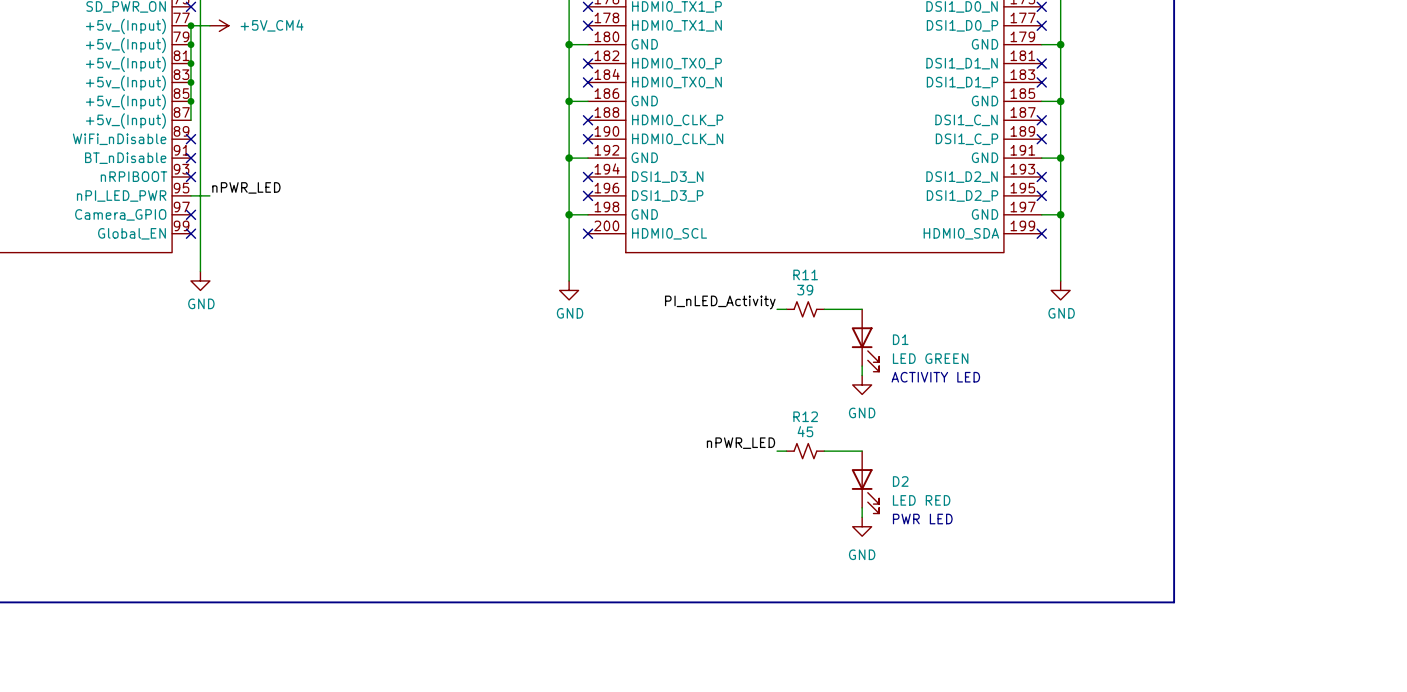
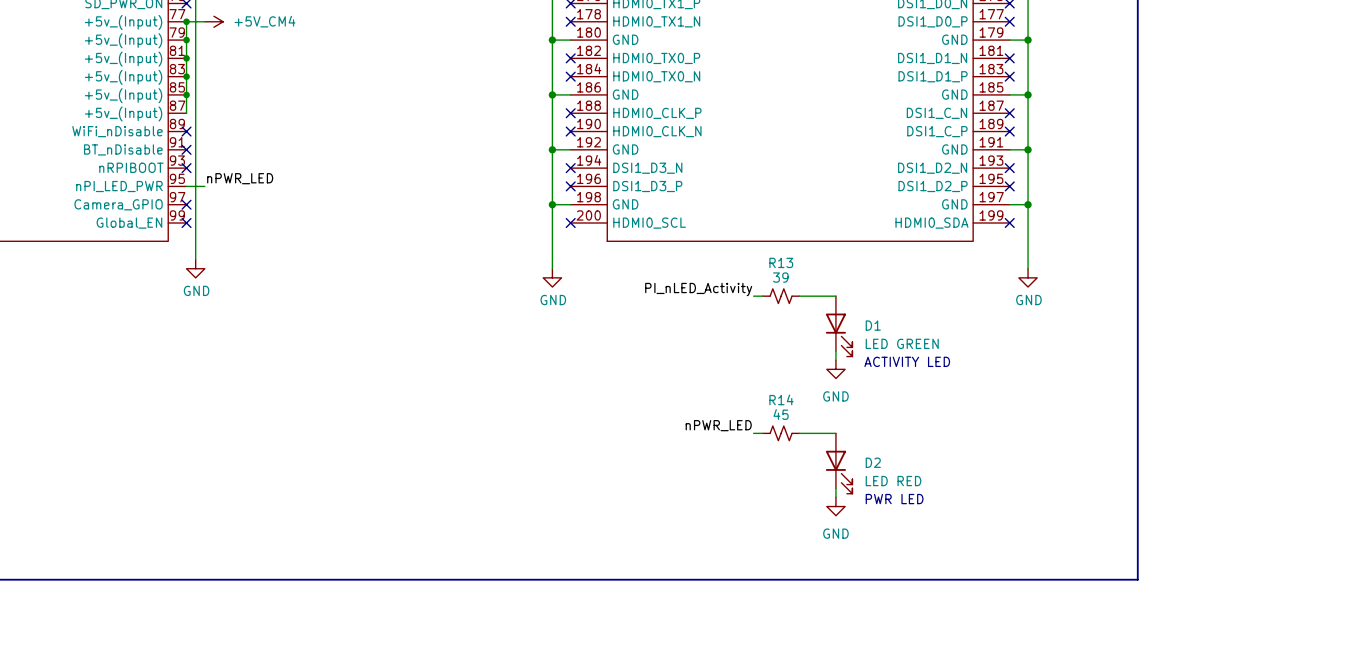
R11 name: R11 (805, 274) -> R13 (781, 262)
R12 name: R12 (805, 416) -> R14 (781, 399)

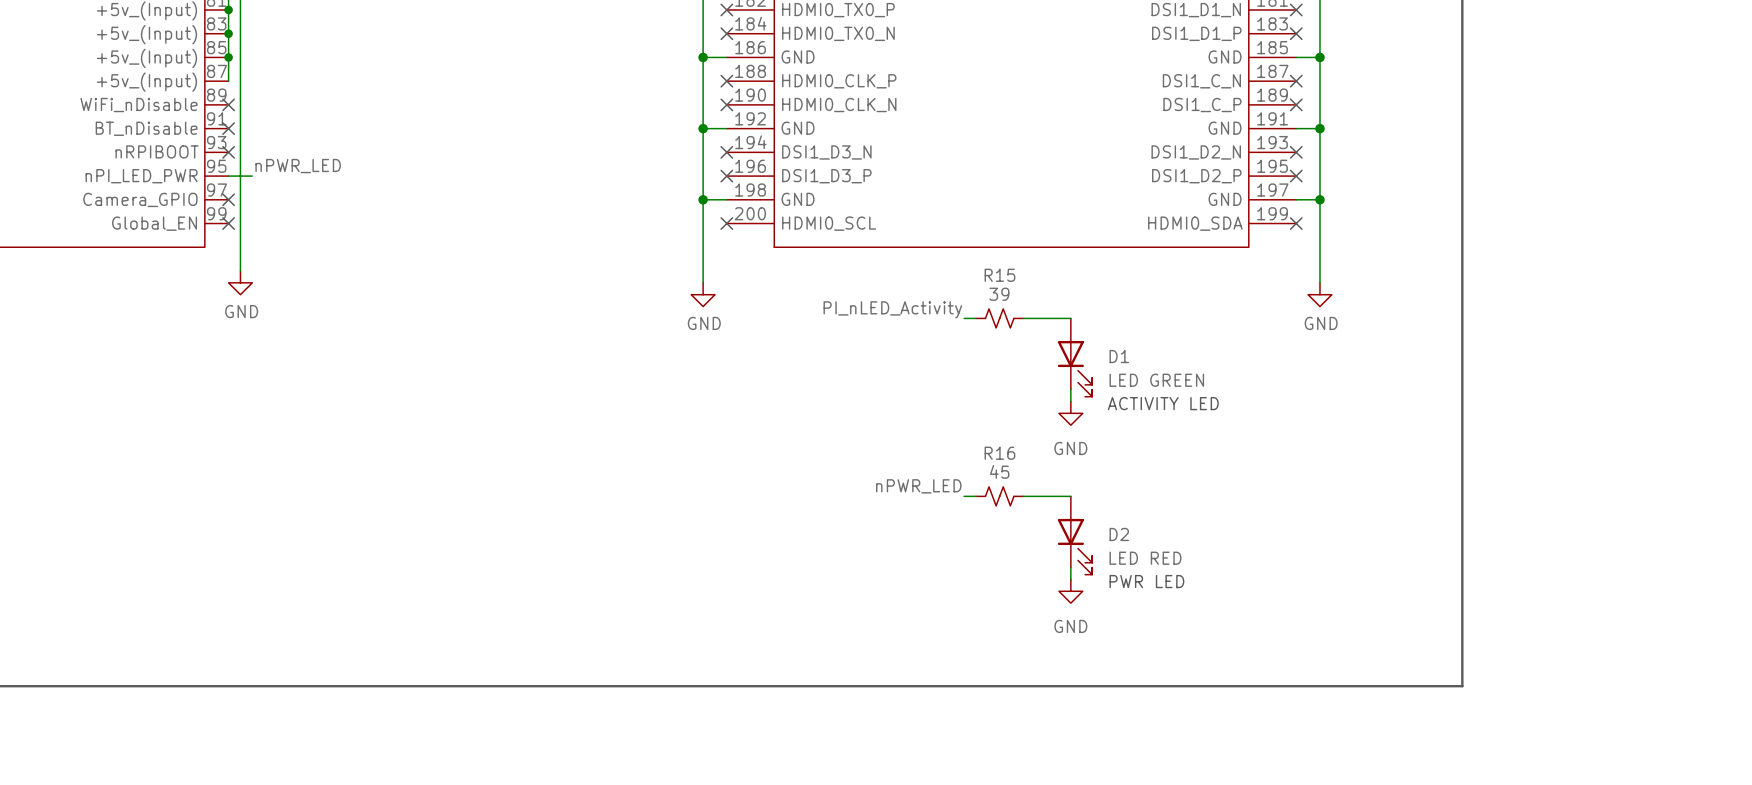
R13 name: R13 (781, 262) -> R15 (999, 275)
R14 name: R14 (781, 399) -> R16 (999, 453)

